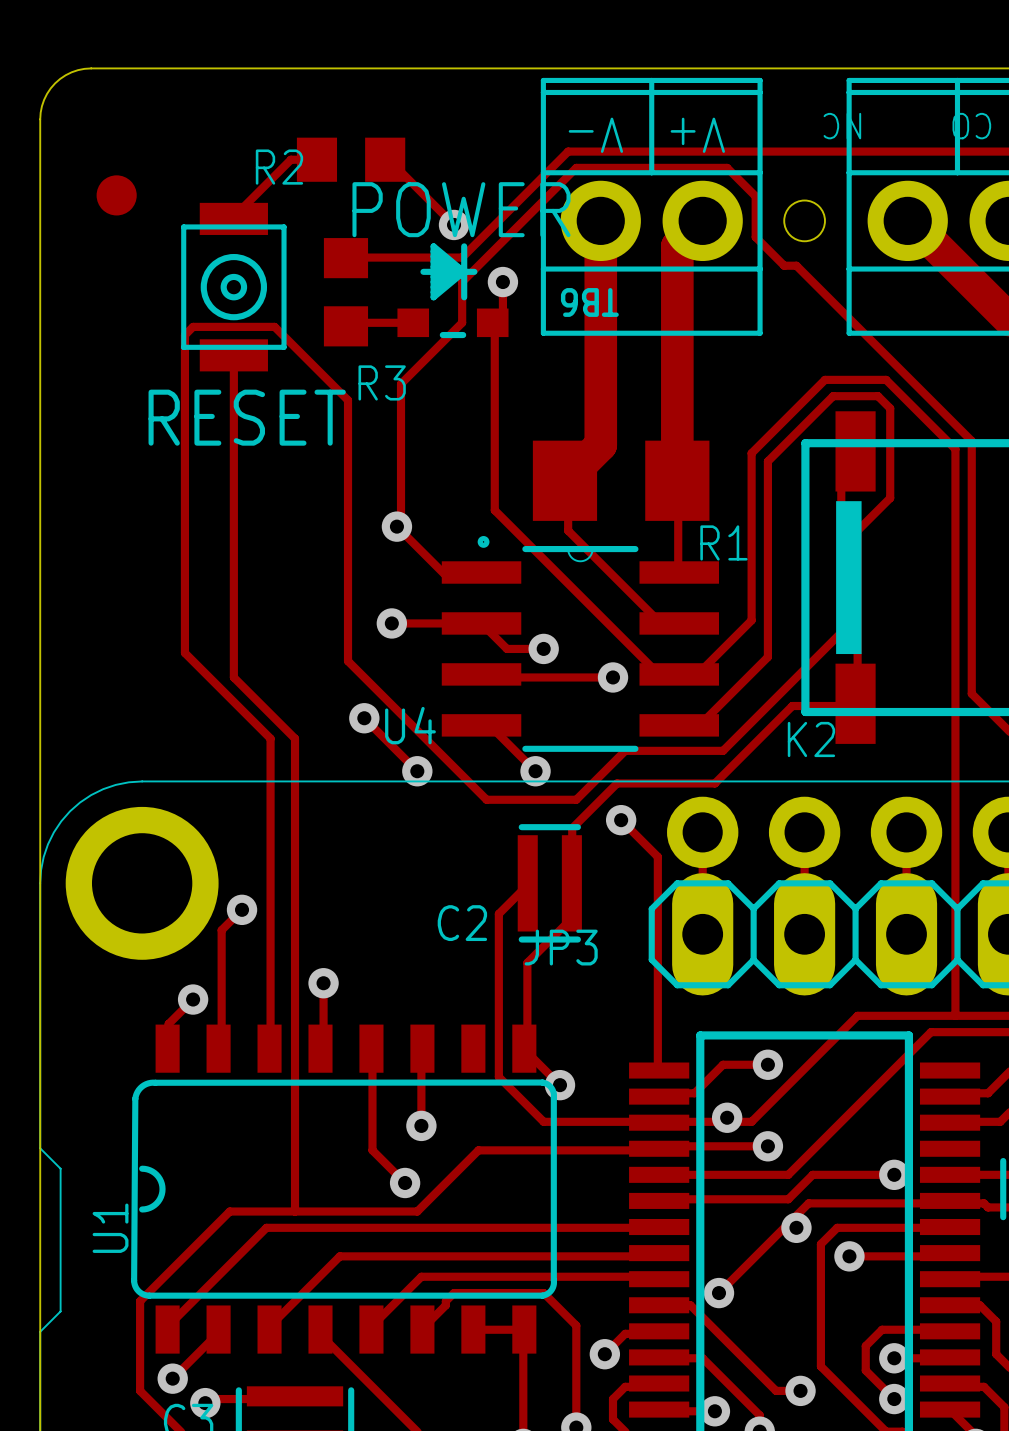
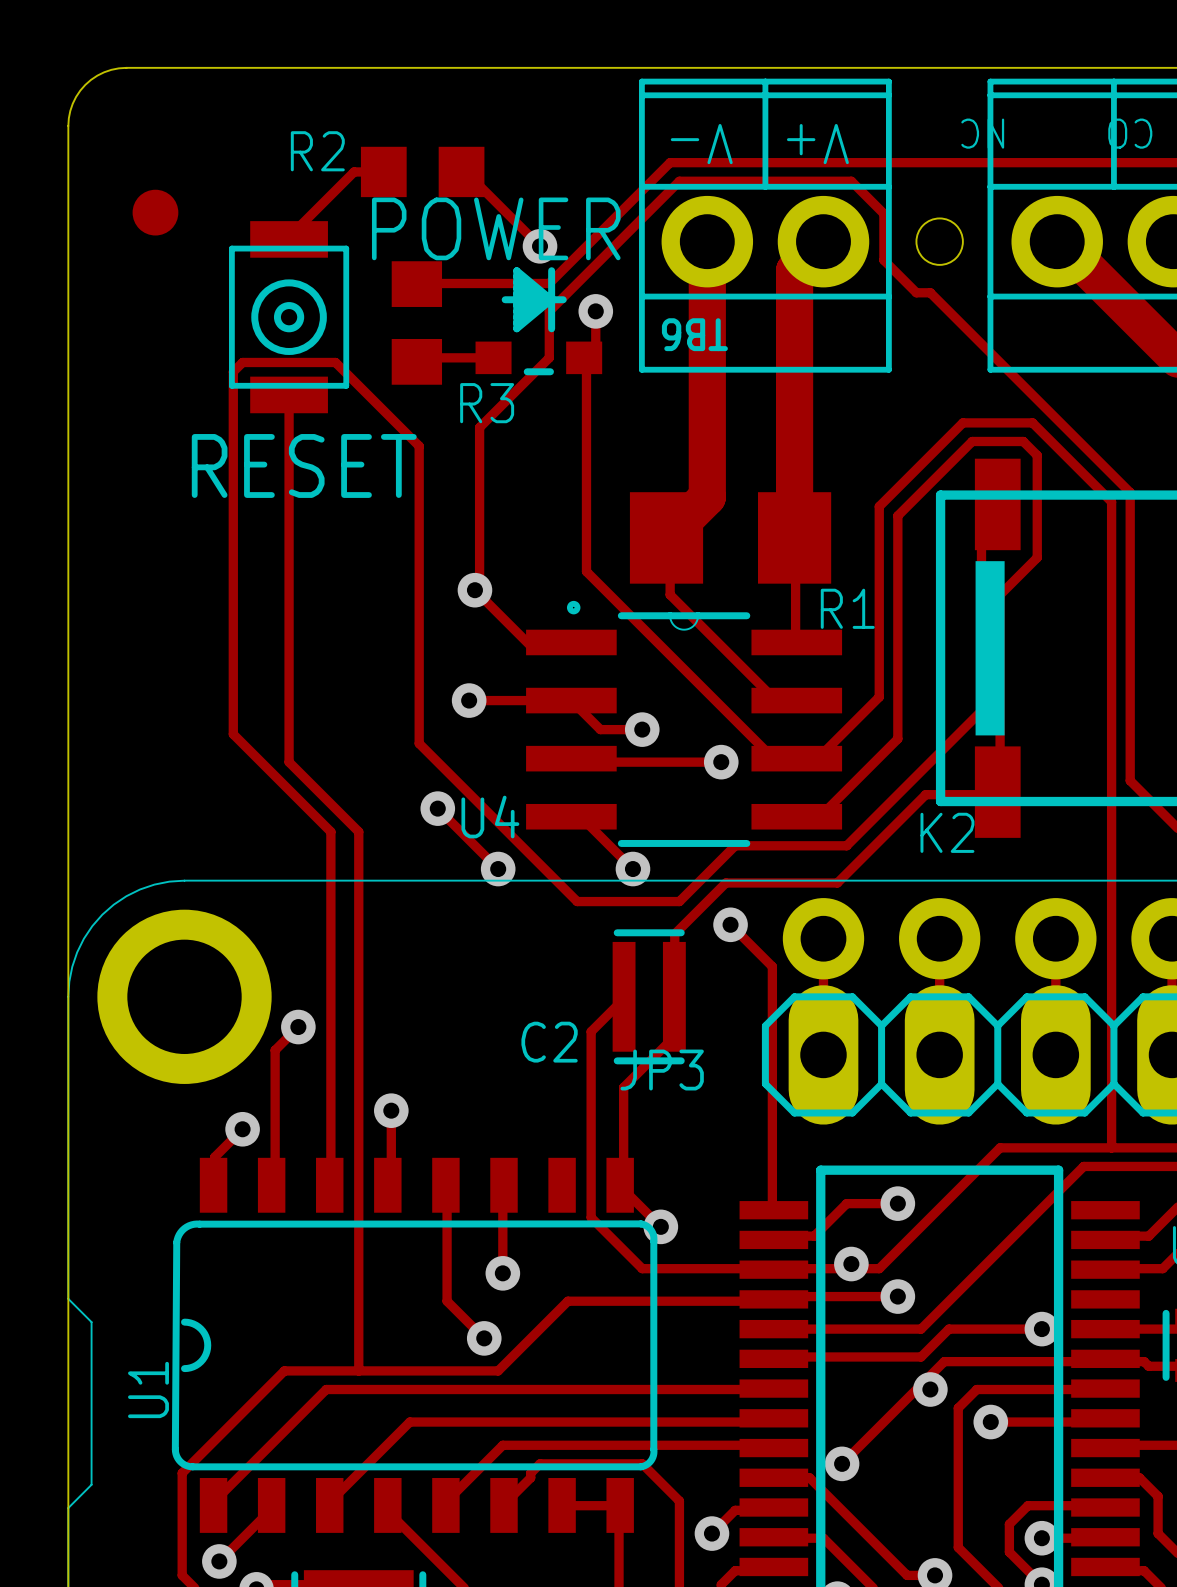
R2 name position: R2 (279, 167) -> R2 (317, 151)
POWER name position: POWER (461, 209) -> POWER (496, 228)
R3 name position: R3 (382, 382) -> R3 (487, 403)

